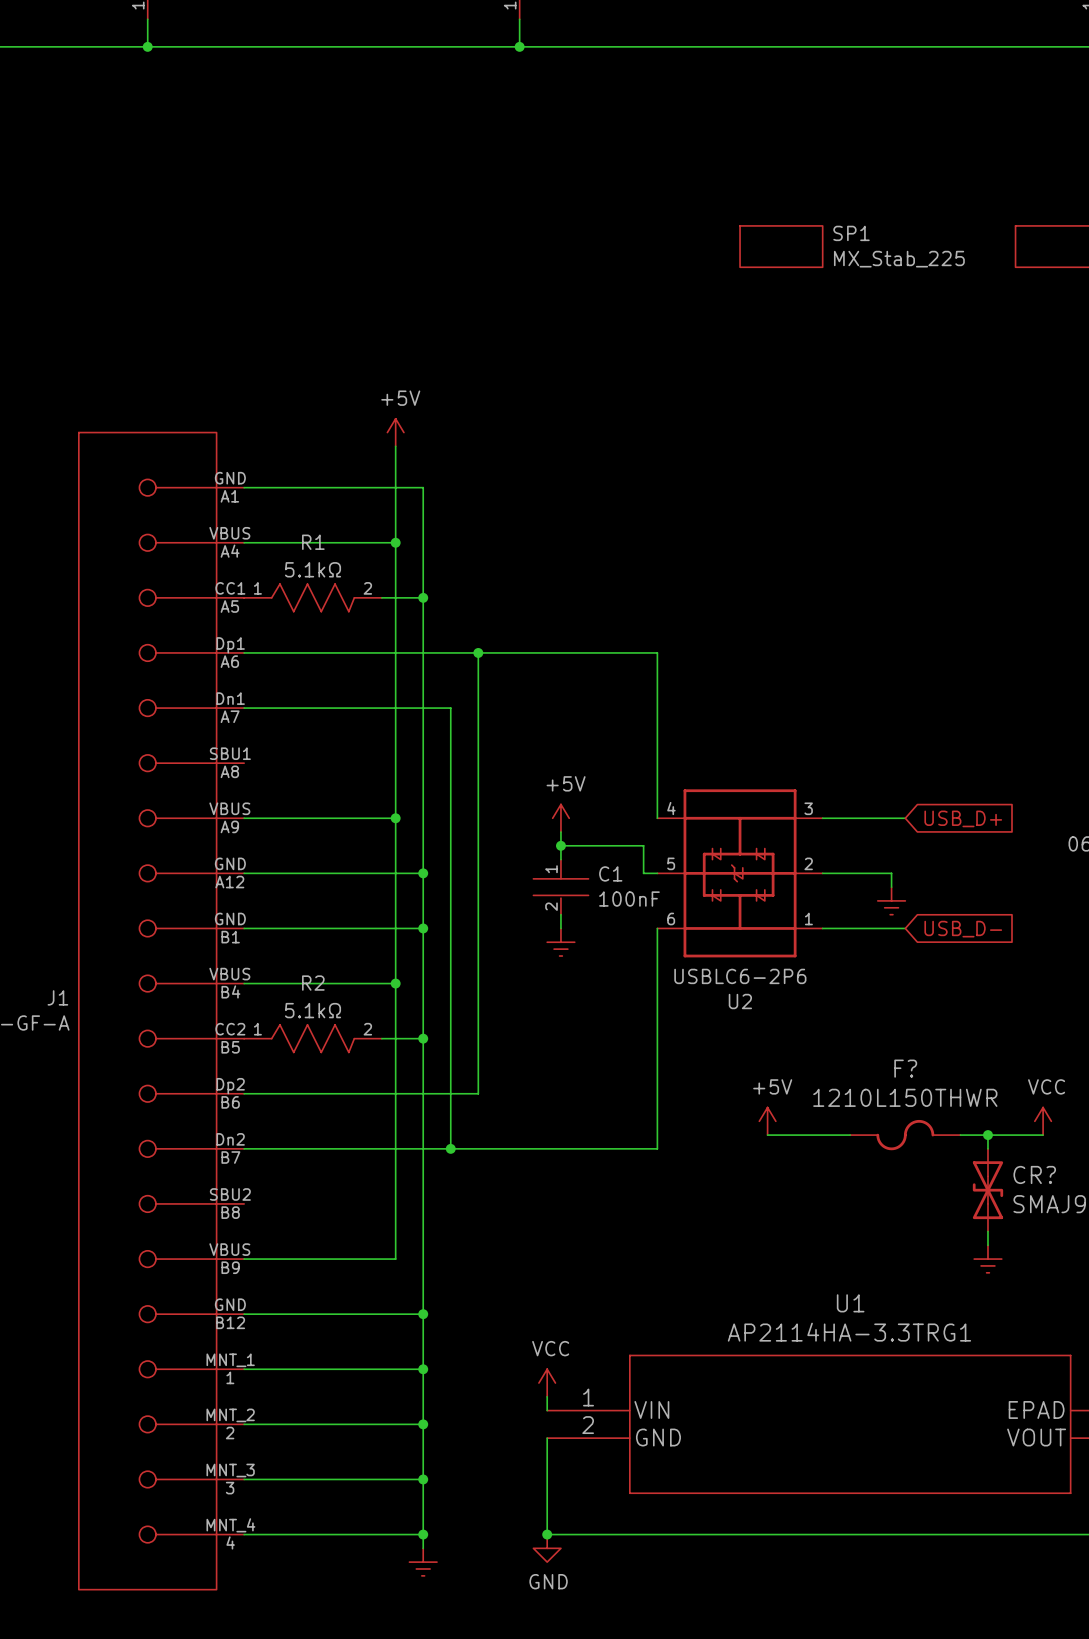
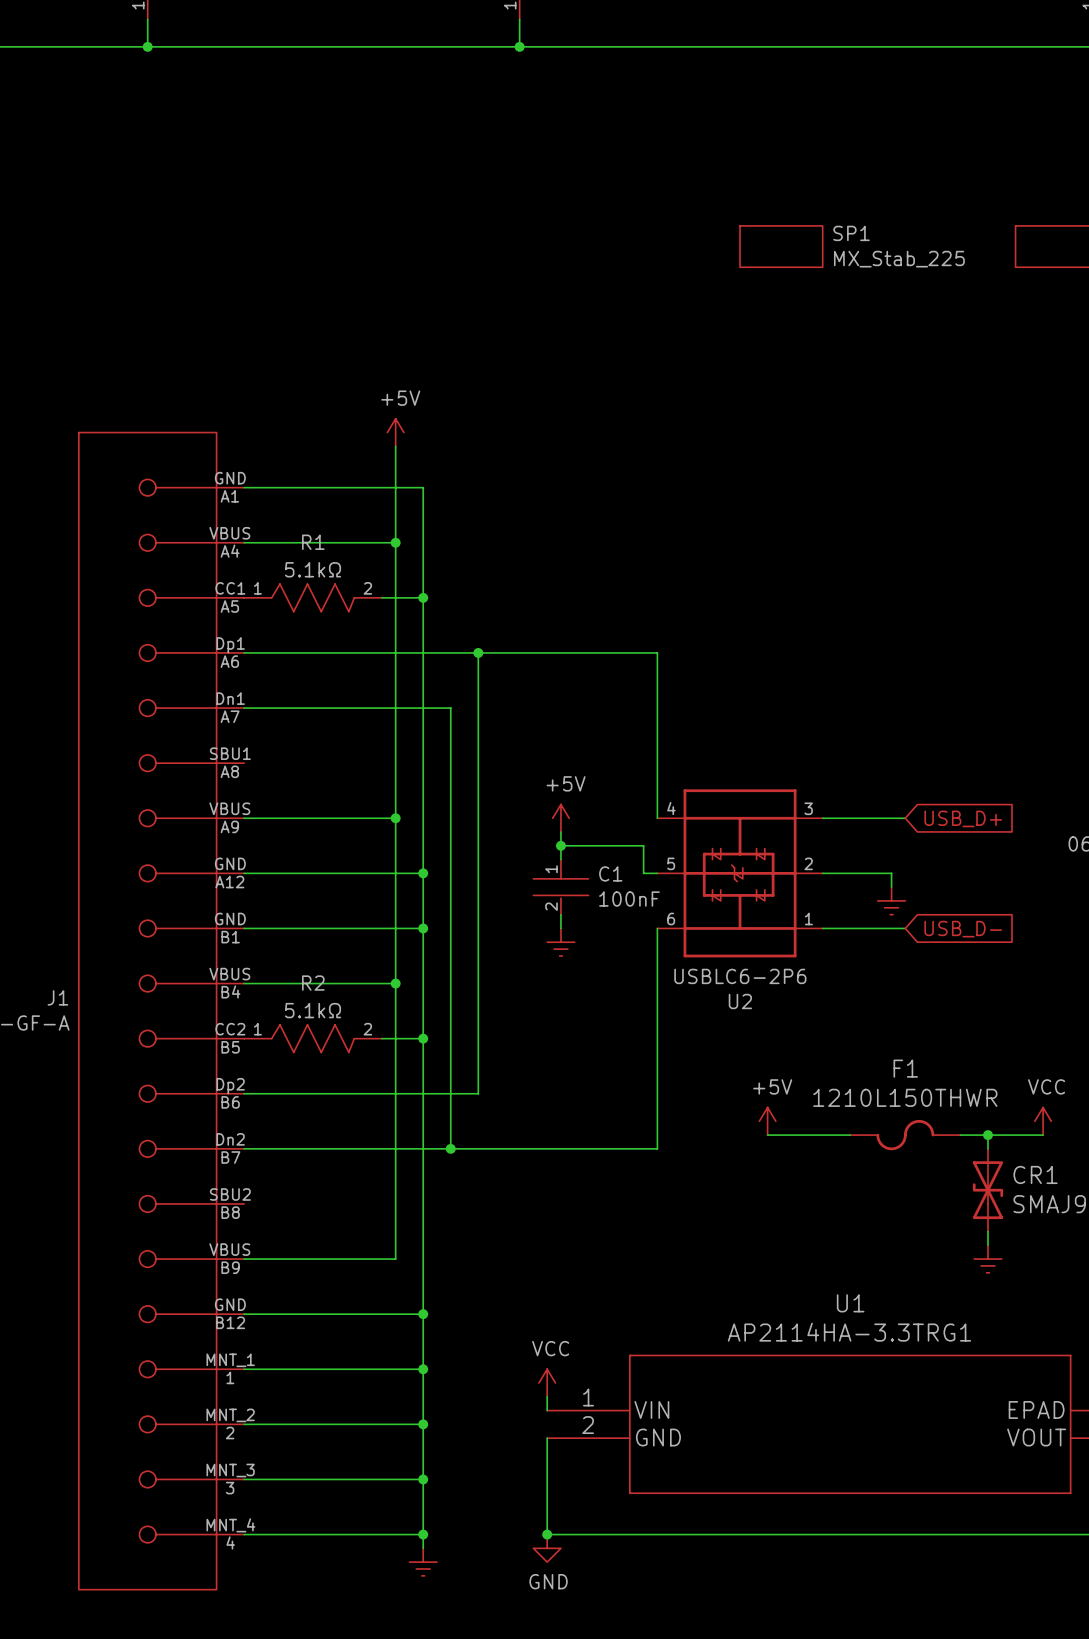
F? name: F? (905, 1068) -> F1 (905, 1068)
CR? name: CR? (1034, 1174) -> CR1 (1035, 1174)

